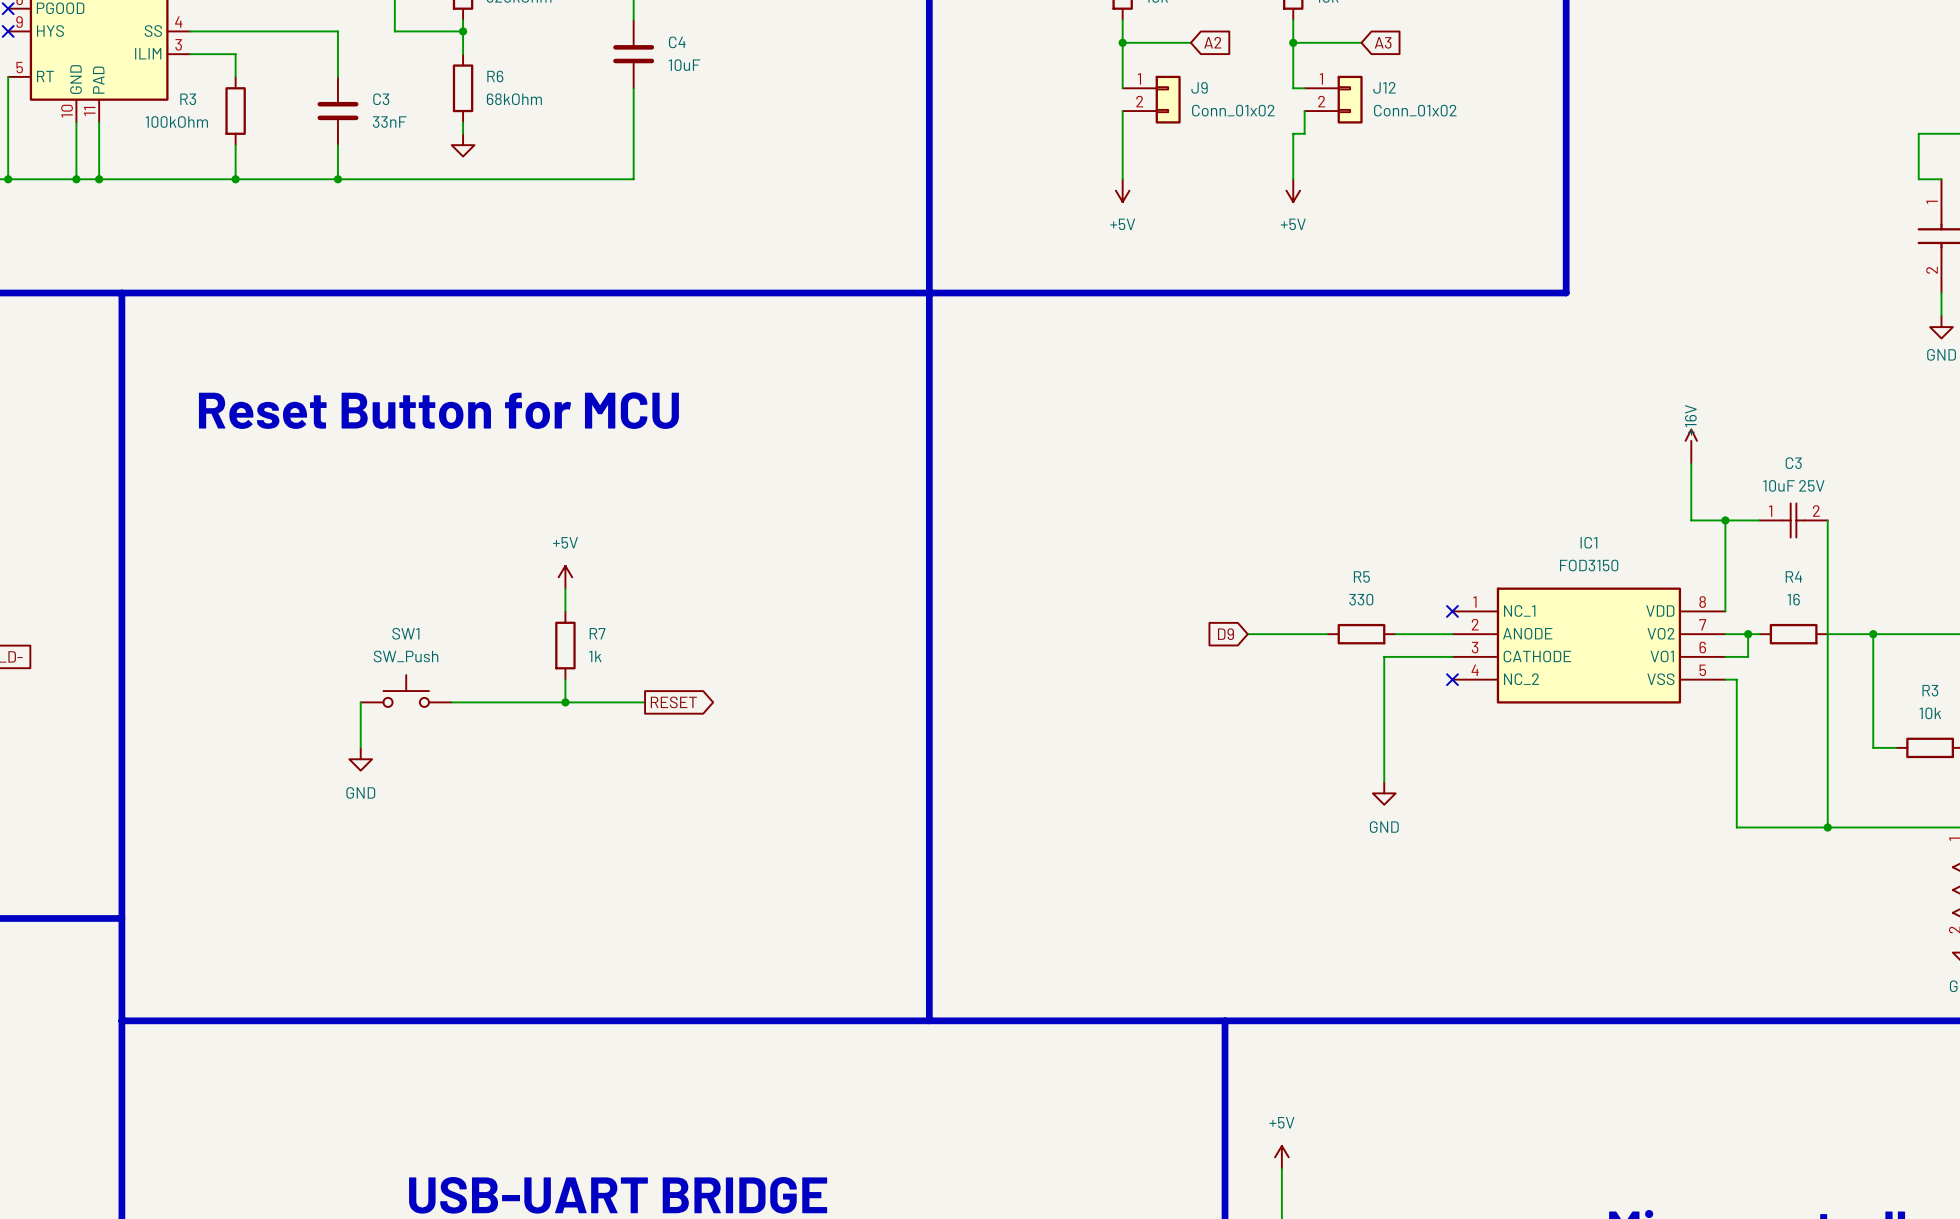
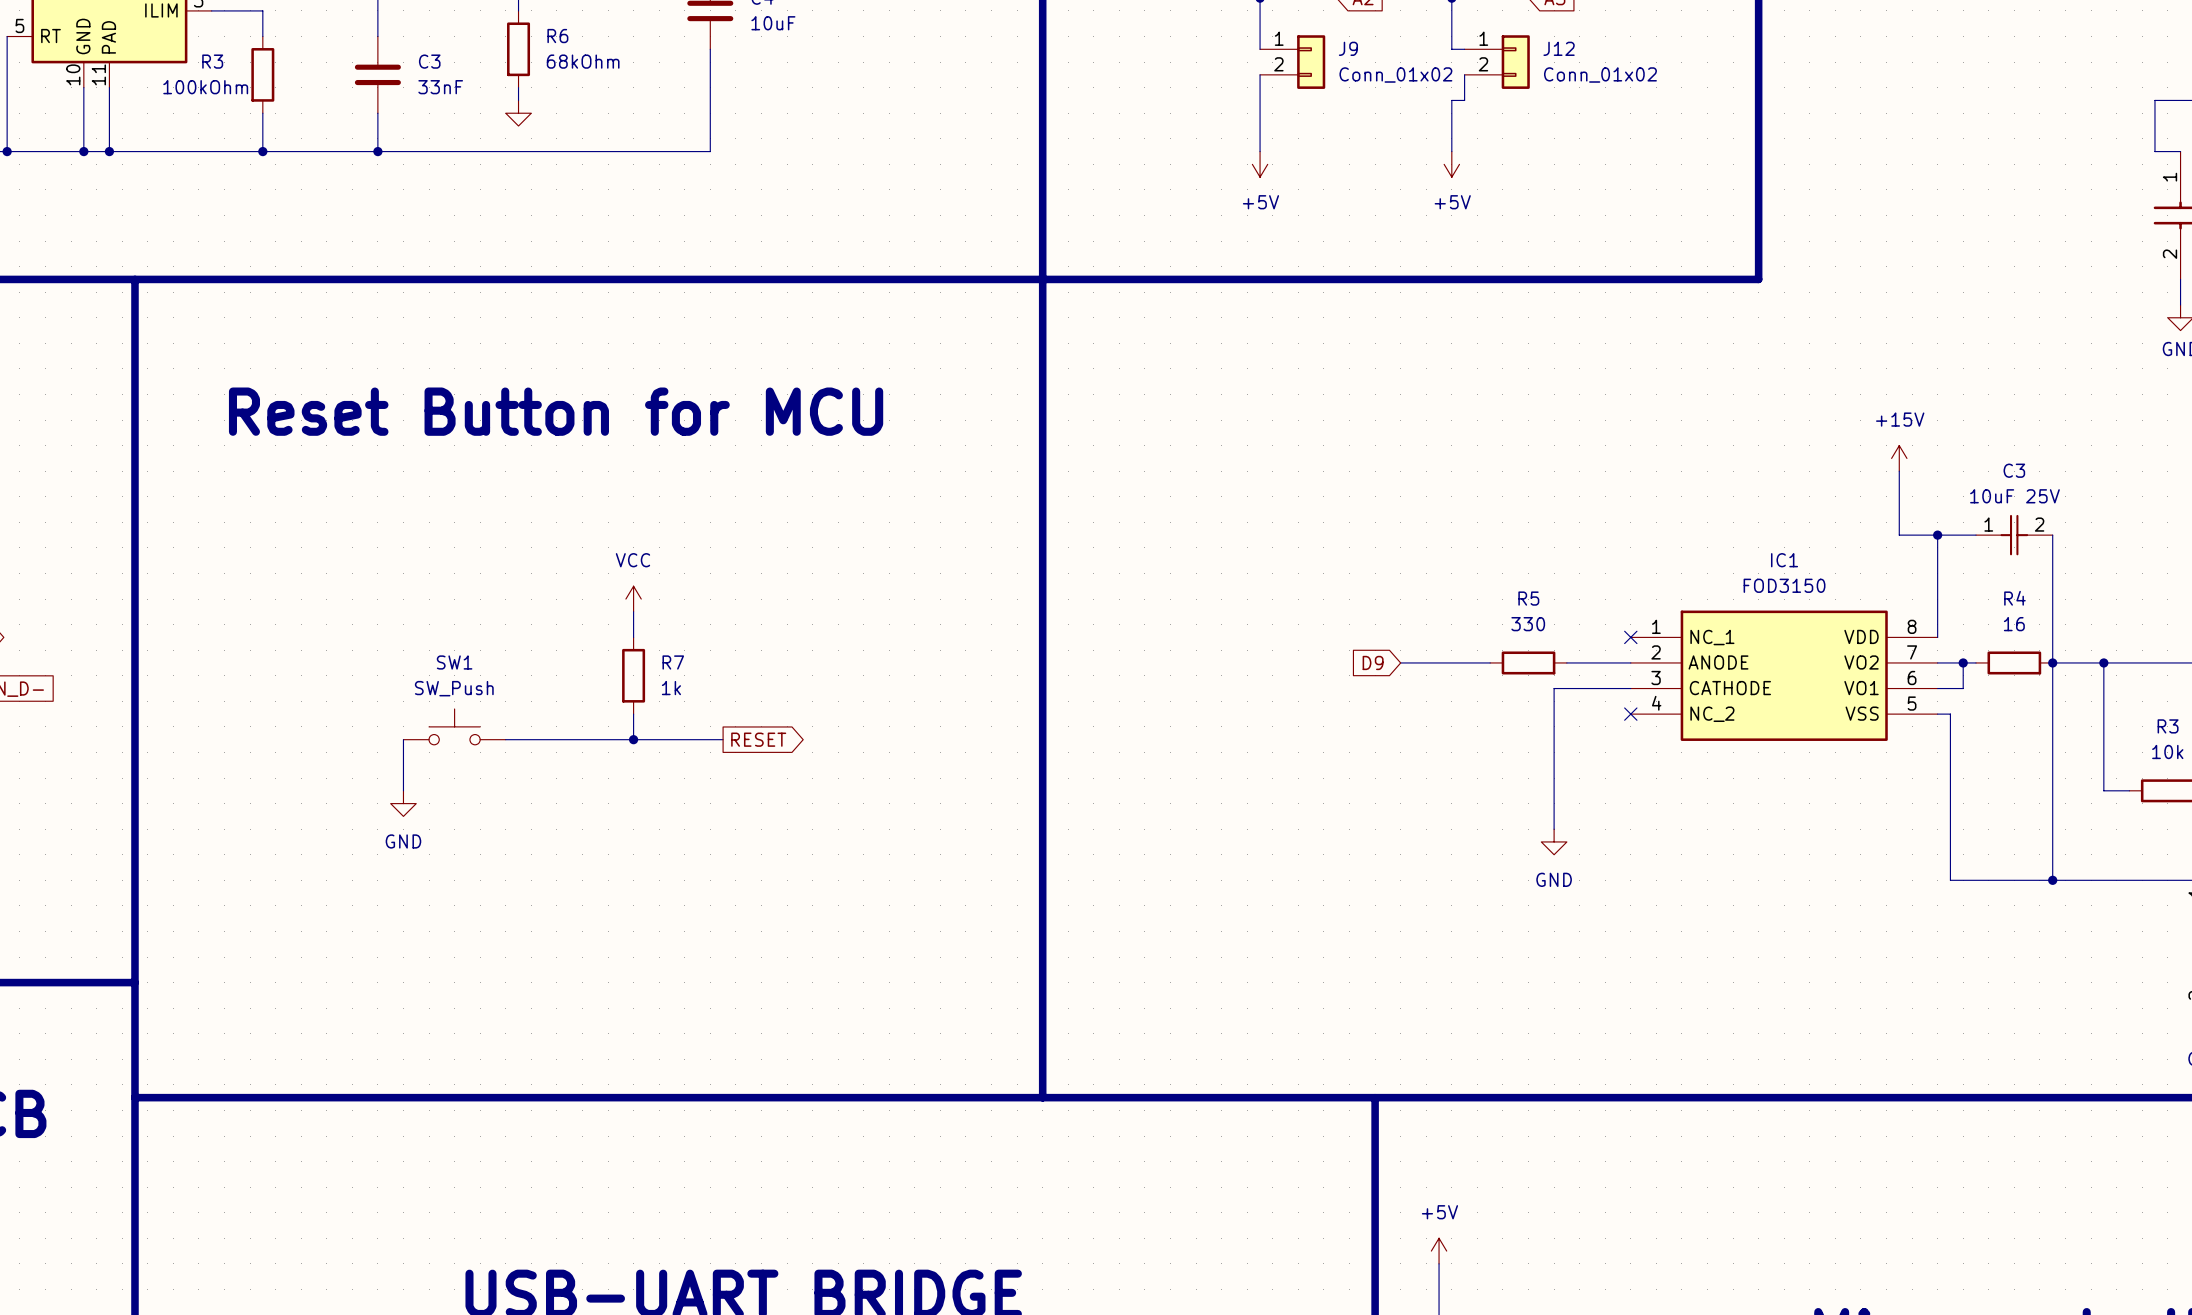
power symbol text: none -> +15V (1900, 419)
power symbol shape: [1685, 429, 1697, 464] -> [1891, 445, 1907, 472]
power symbol: +5V (565, 577) -> VCC (633, 599)
junction: none -> (2052, 662)

